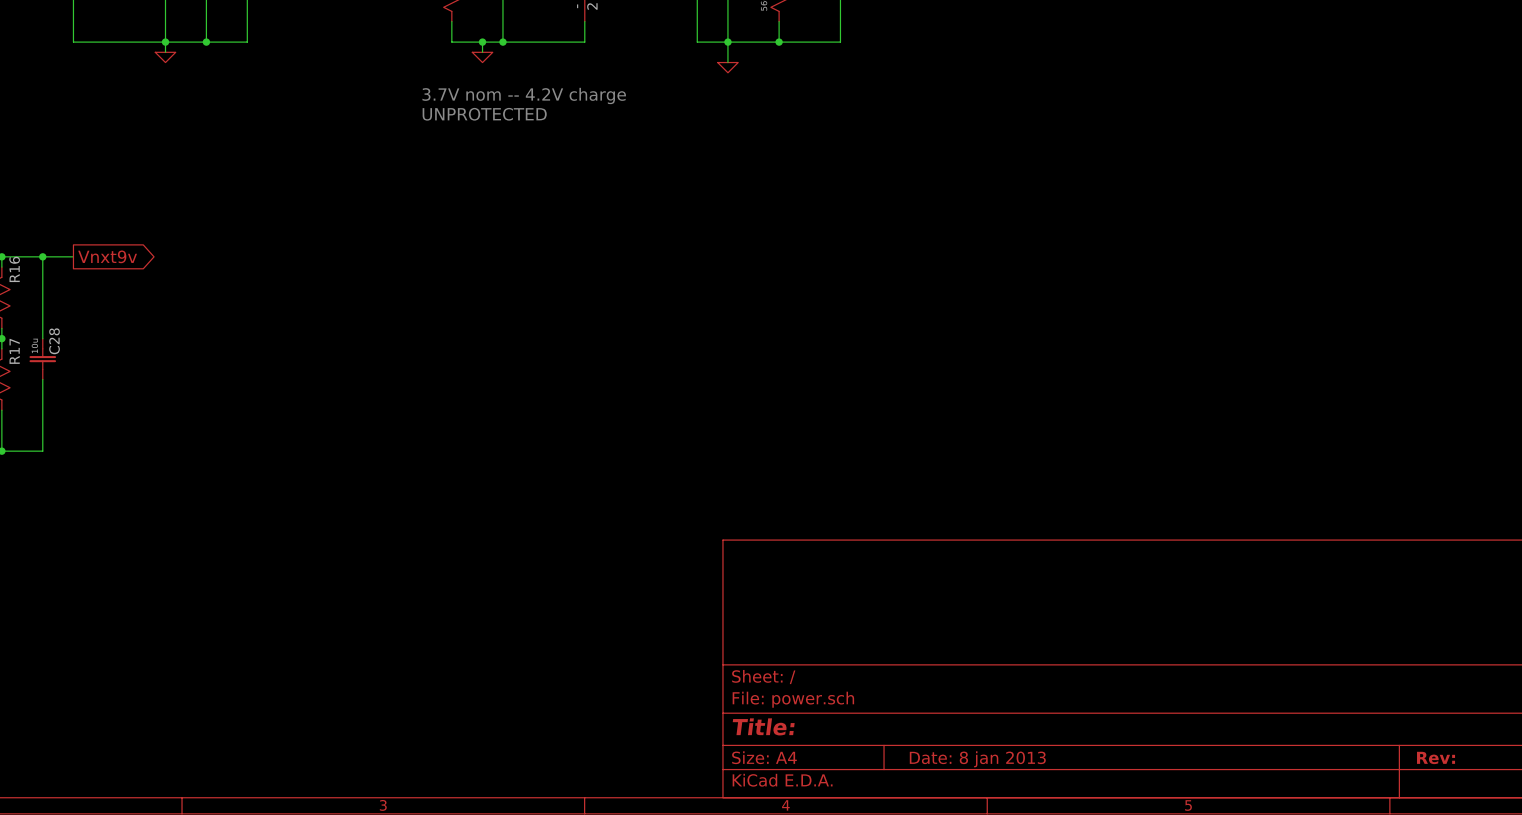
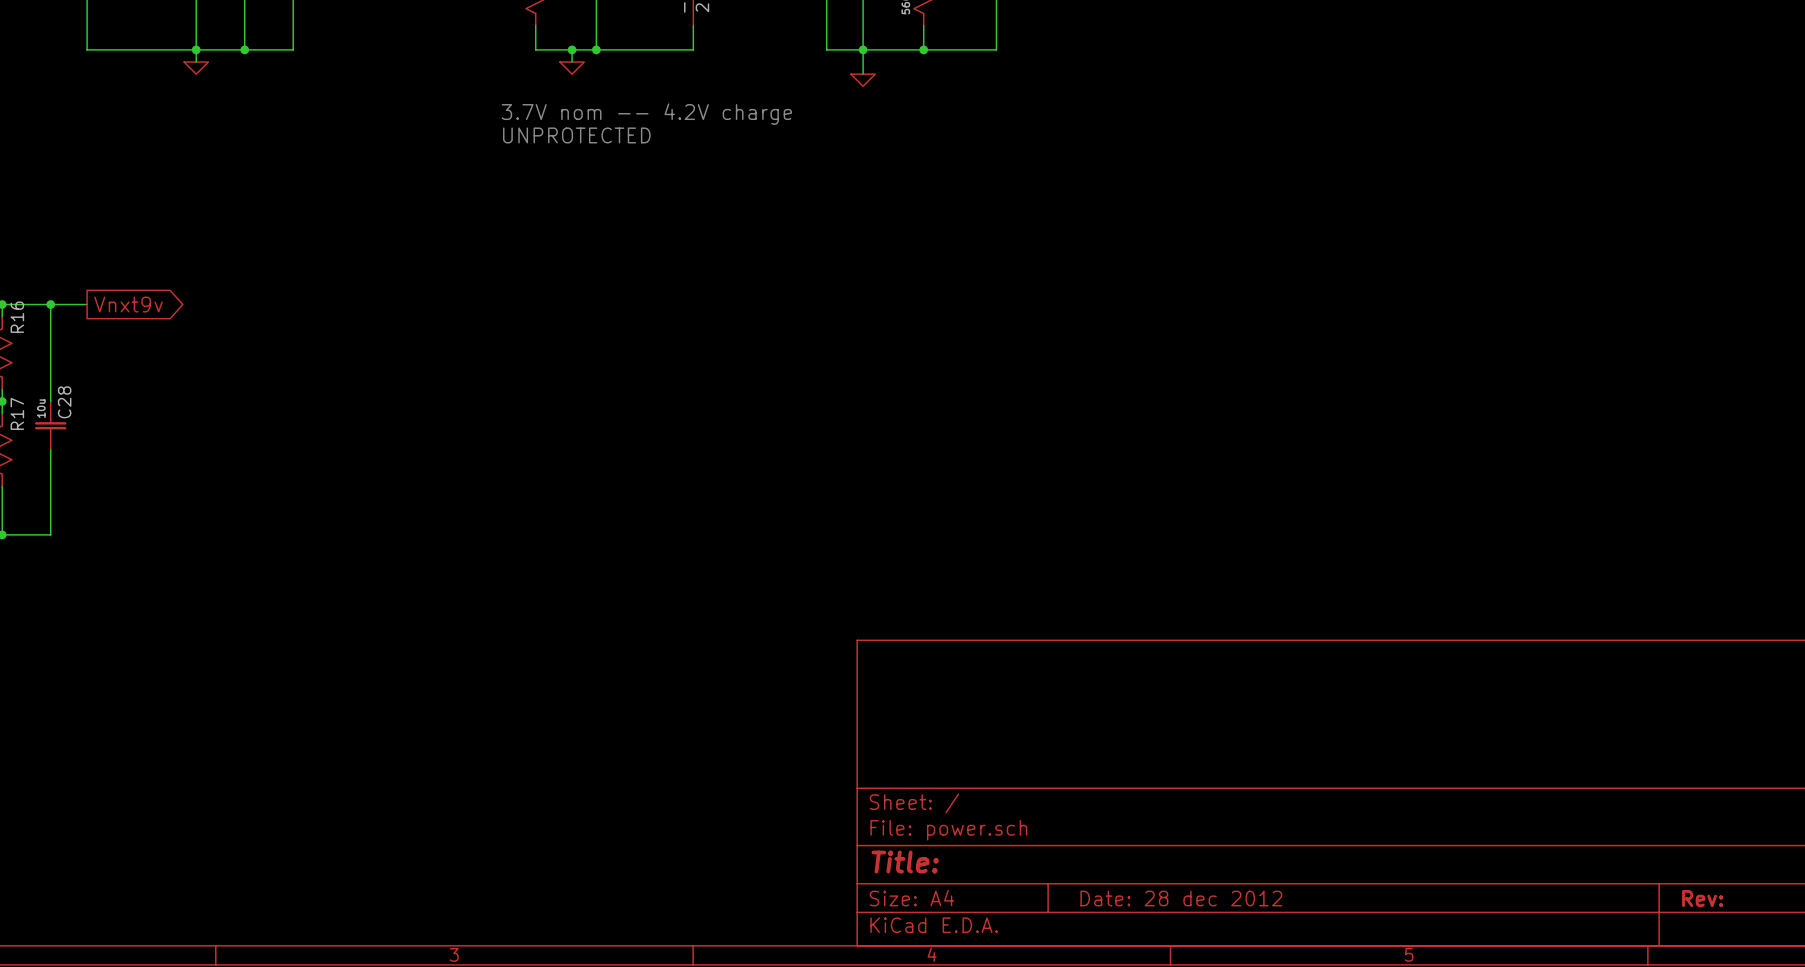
title block: Date: 8 jan 2013 (977, 759) -> Date: 28 dec 2012 (1181, 898)

